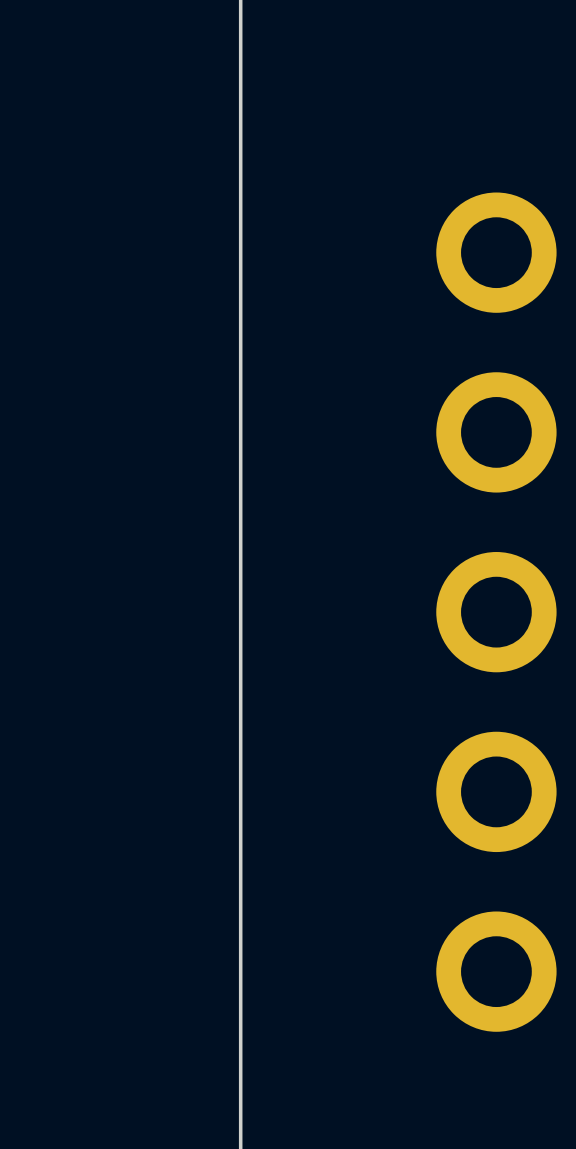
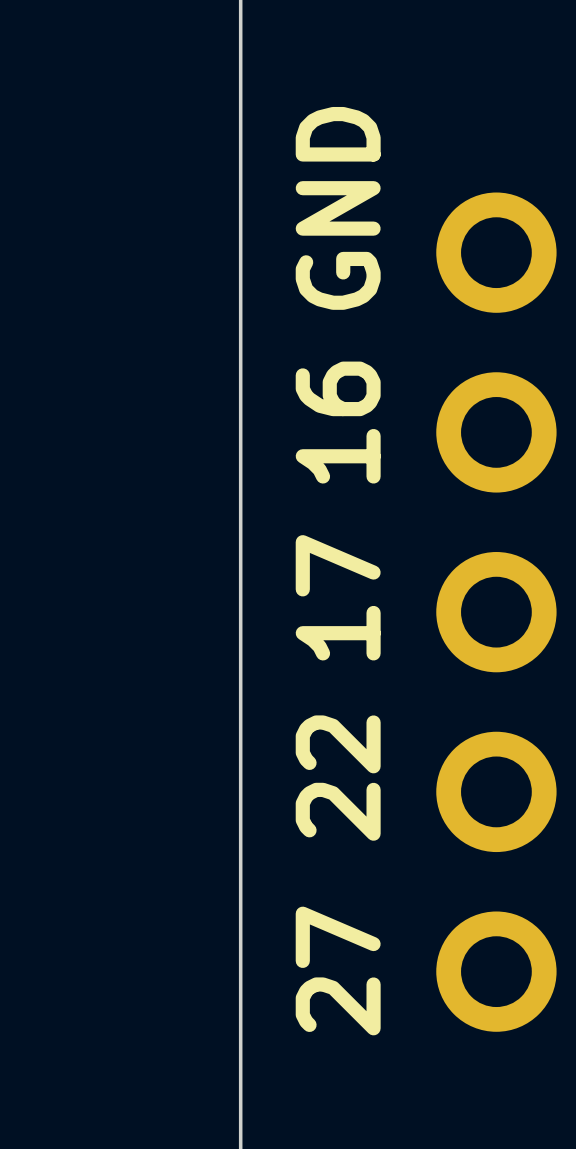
text: none -> GND (338, 208)
text: none -> 16 (338, 422)
text: none -> 17 (338, 597)
text: none -> 22 (338, 778)
text: none -> 27 (338, 971)

